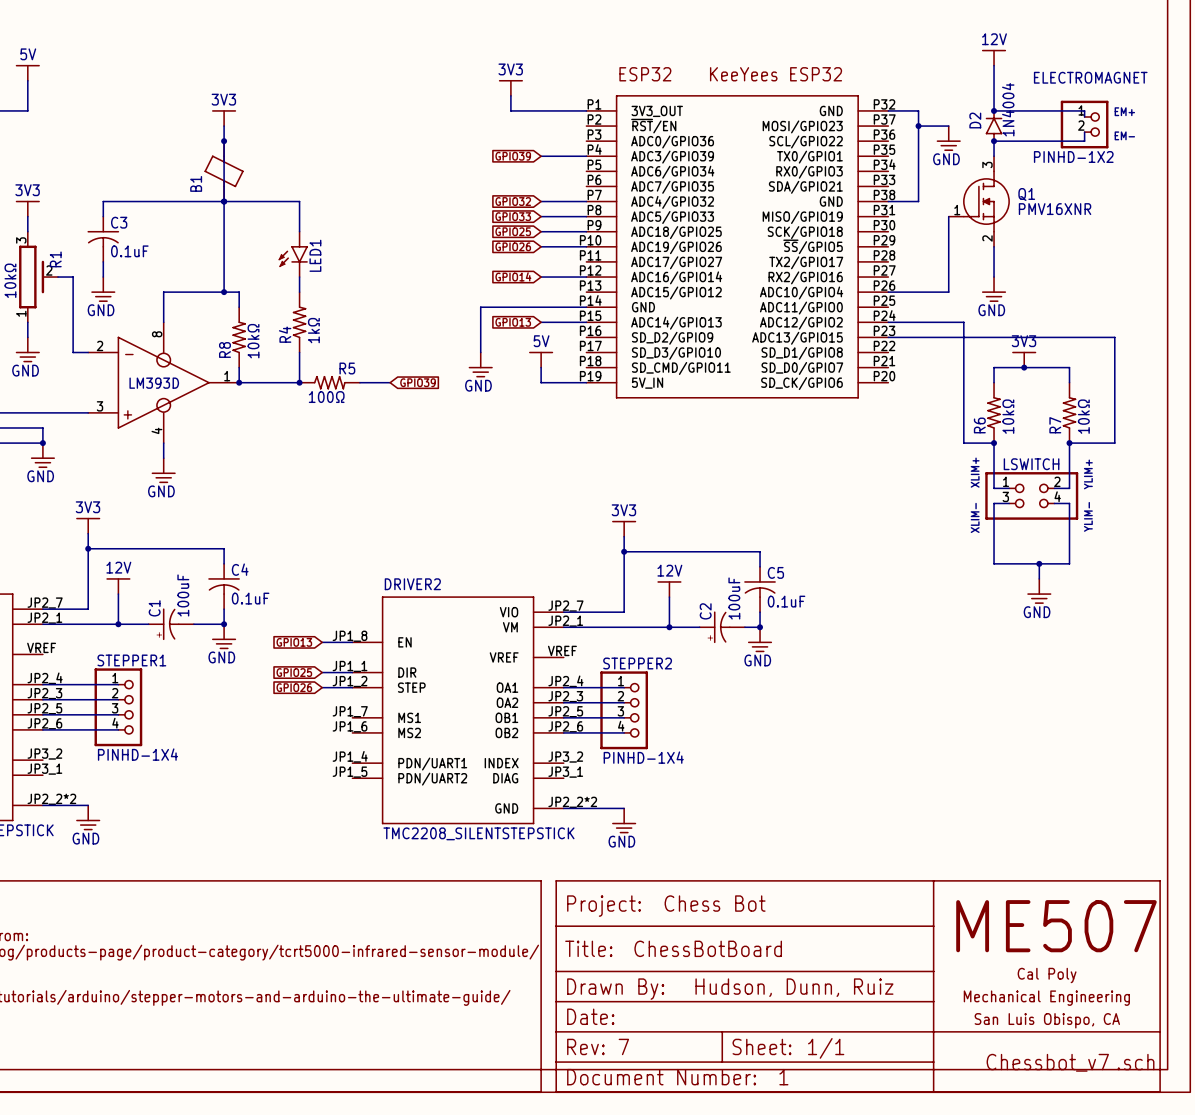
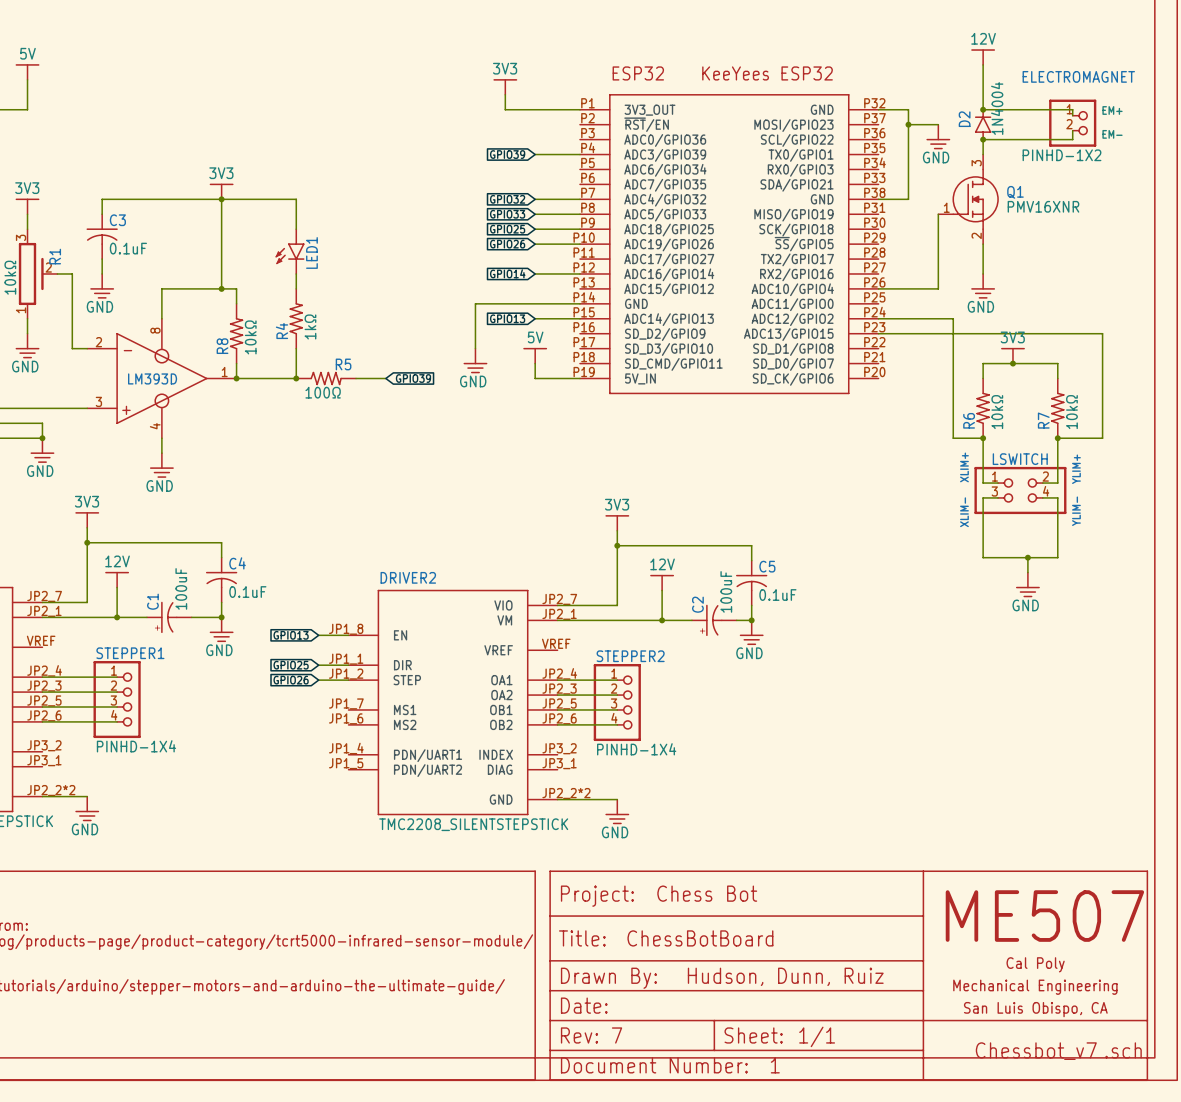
power symbol position: 3V3 (224, 118) -> 3V3 (221, 191)
wire: (224, 126) (224, 201) -> none
junction: (224, 141) -> none
B1: (224, 171) -> none

